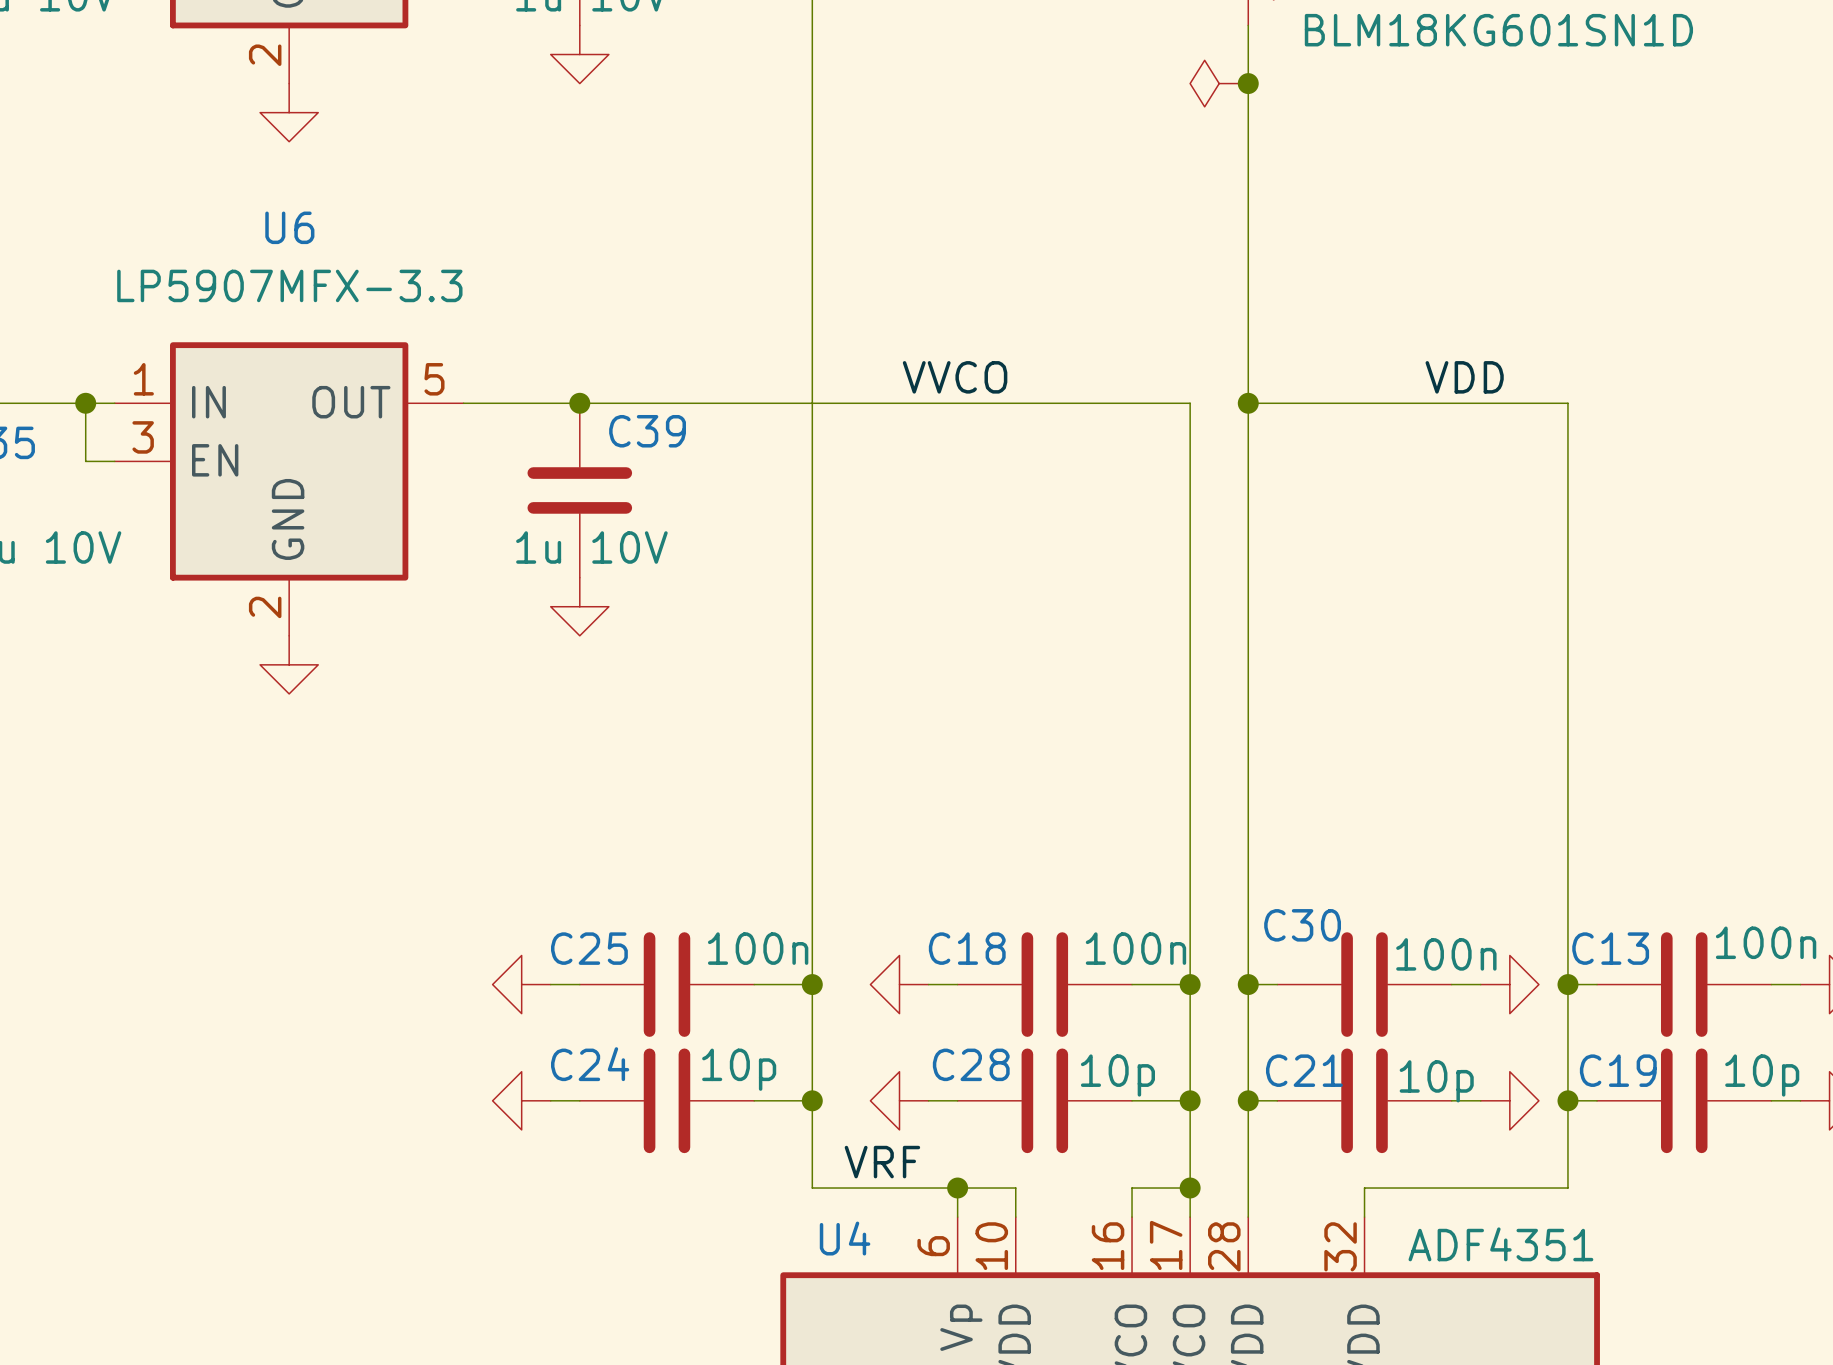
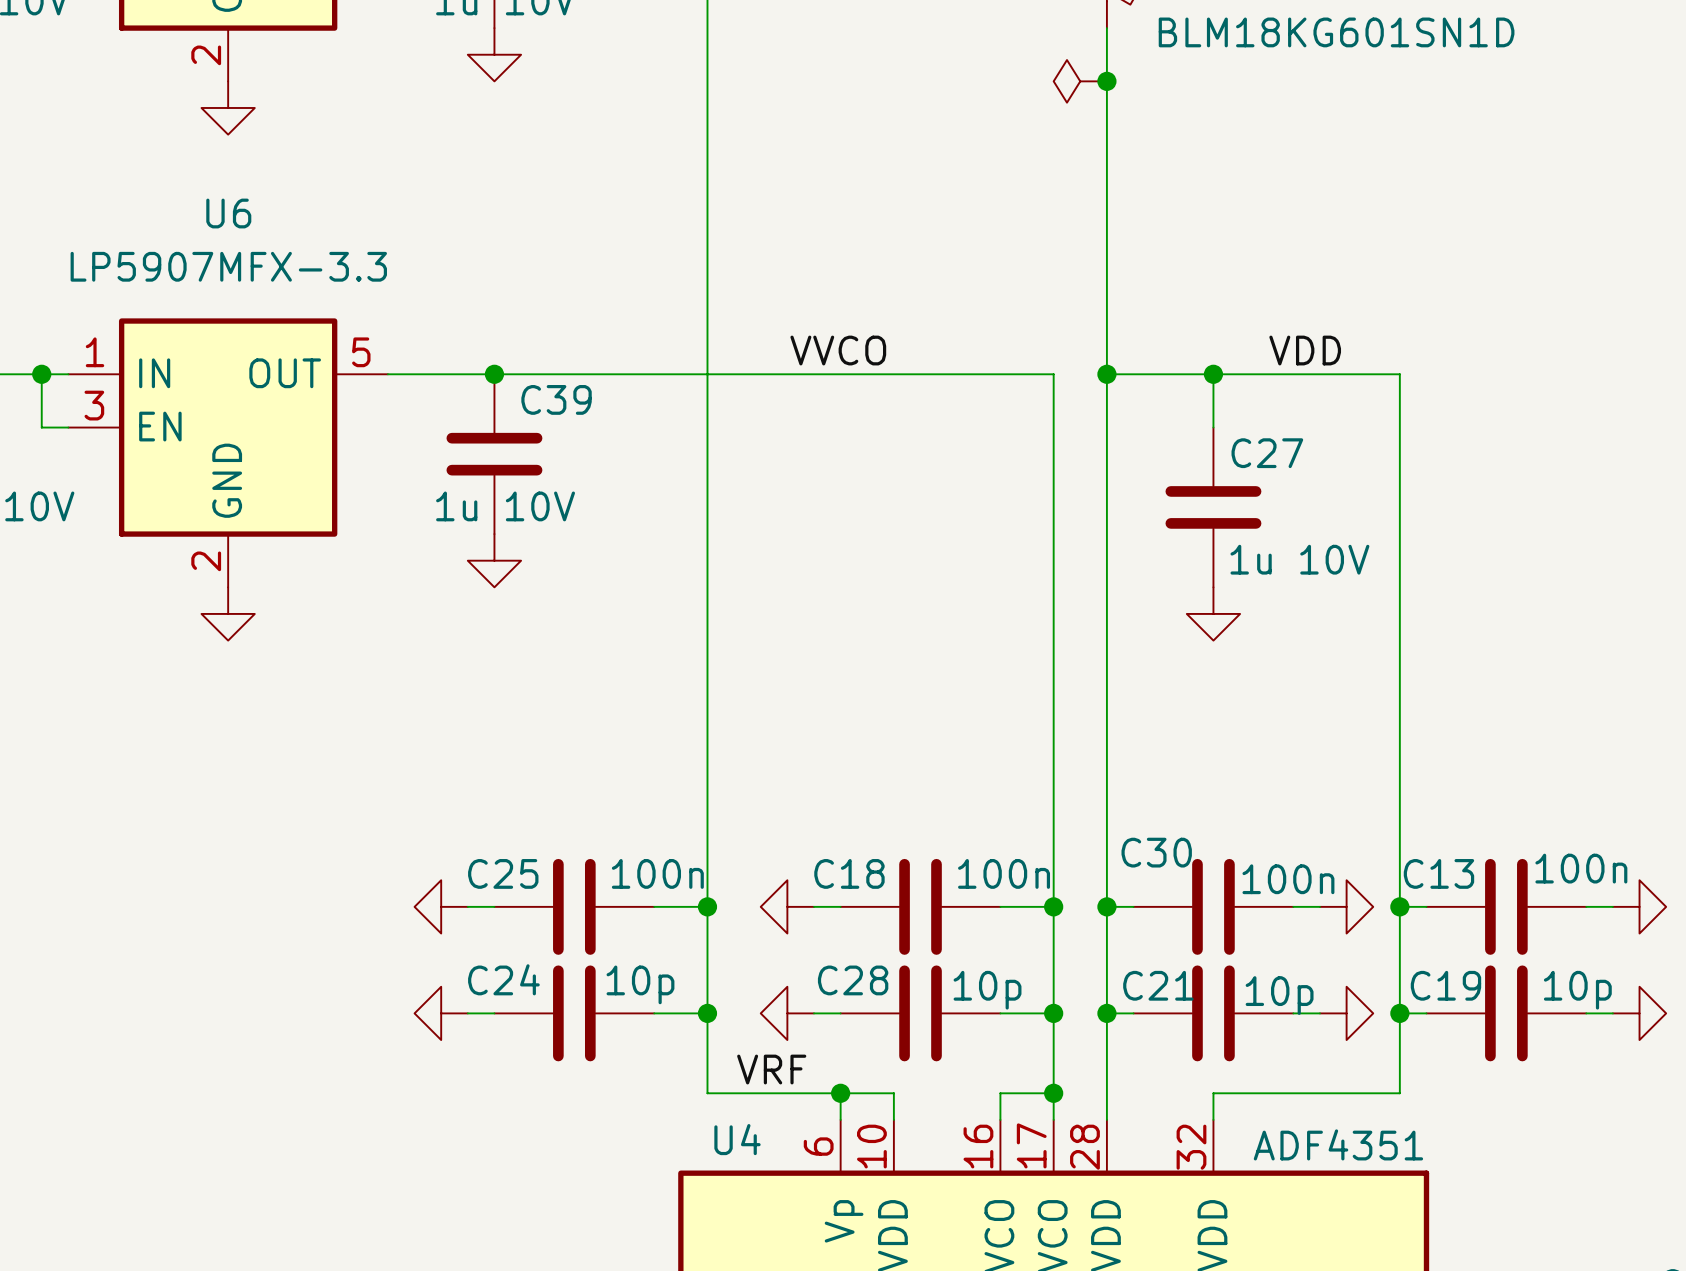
wire: none -> (1213, 374) (1213, 427)
junction: none -> (1213, 374)
C27: none -> 1u 10V (1213, 507)
power symbol: none -> (1213, 613)

